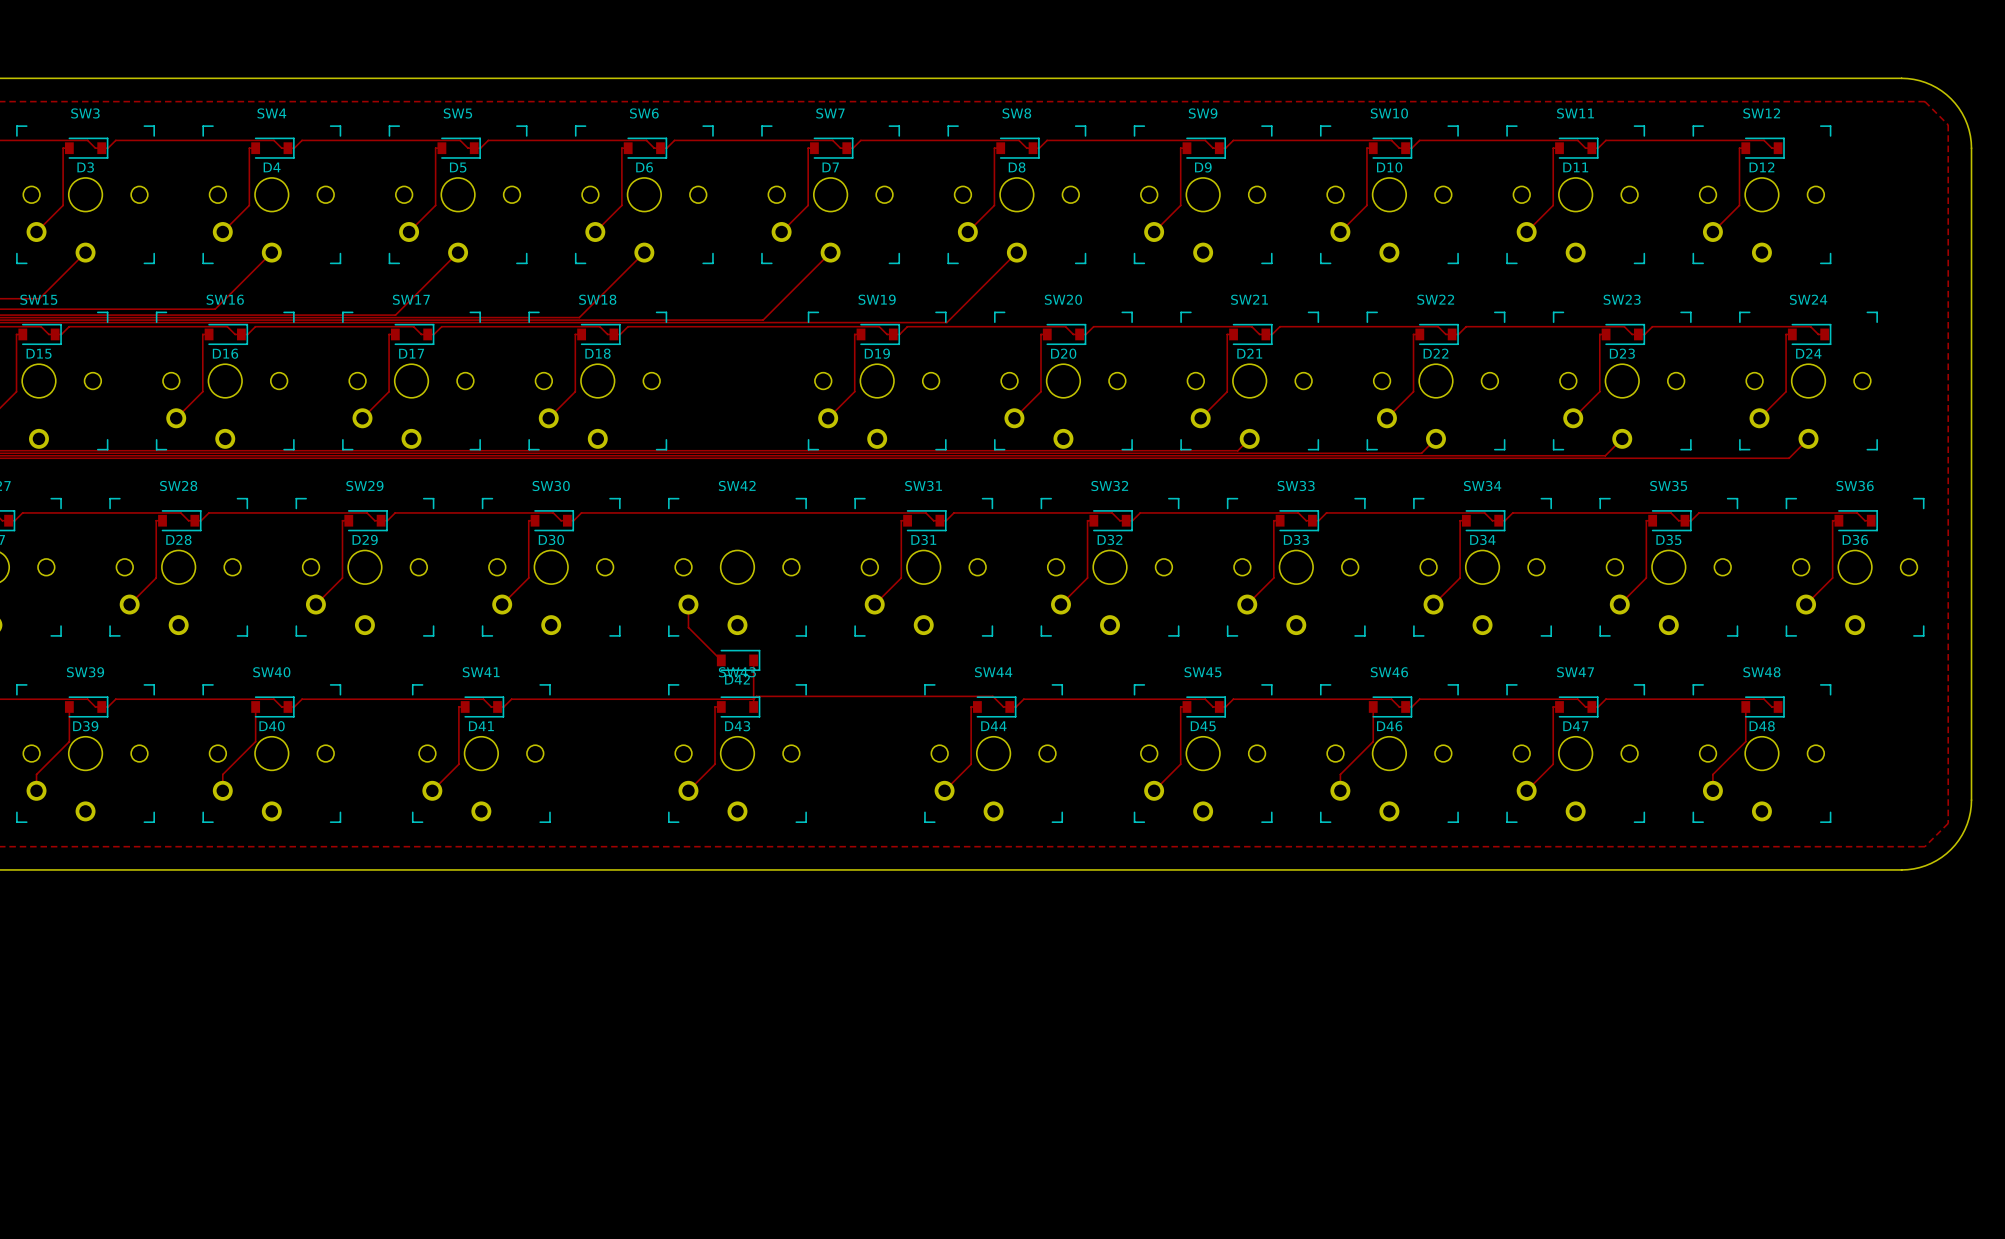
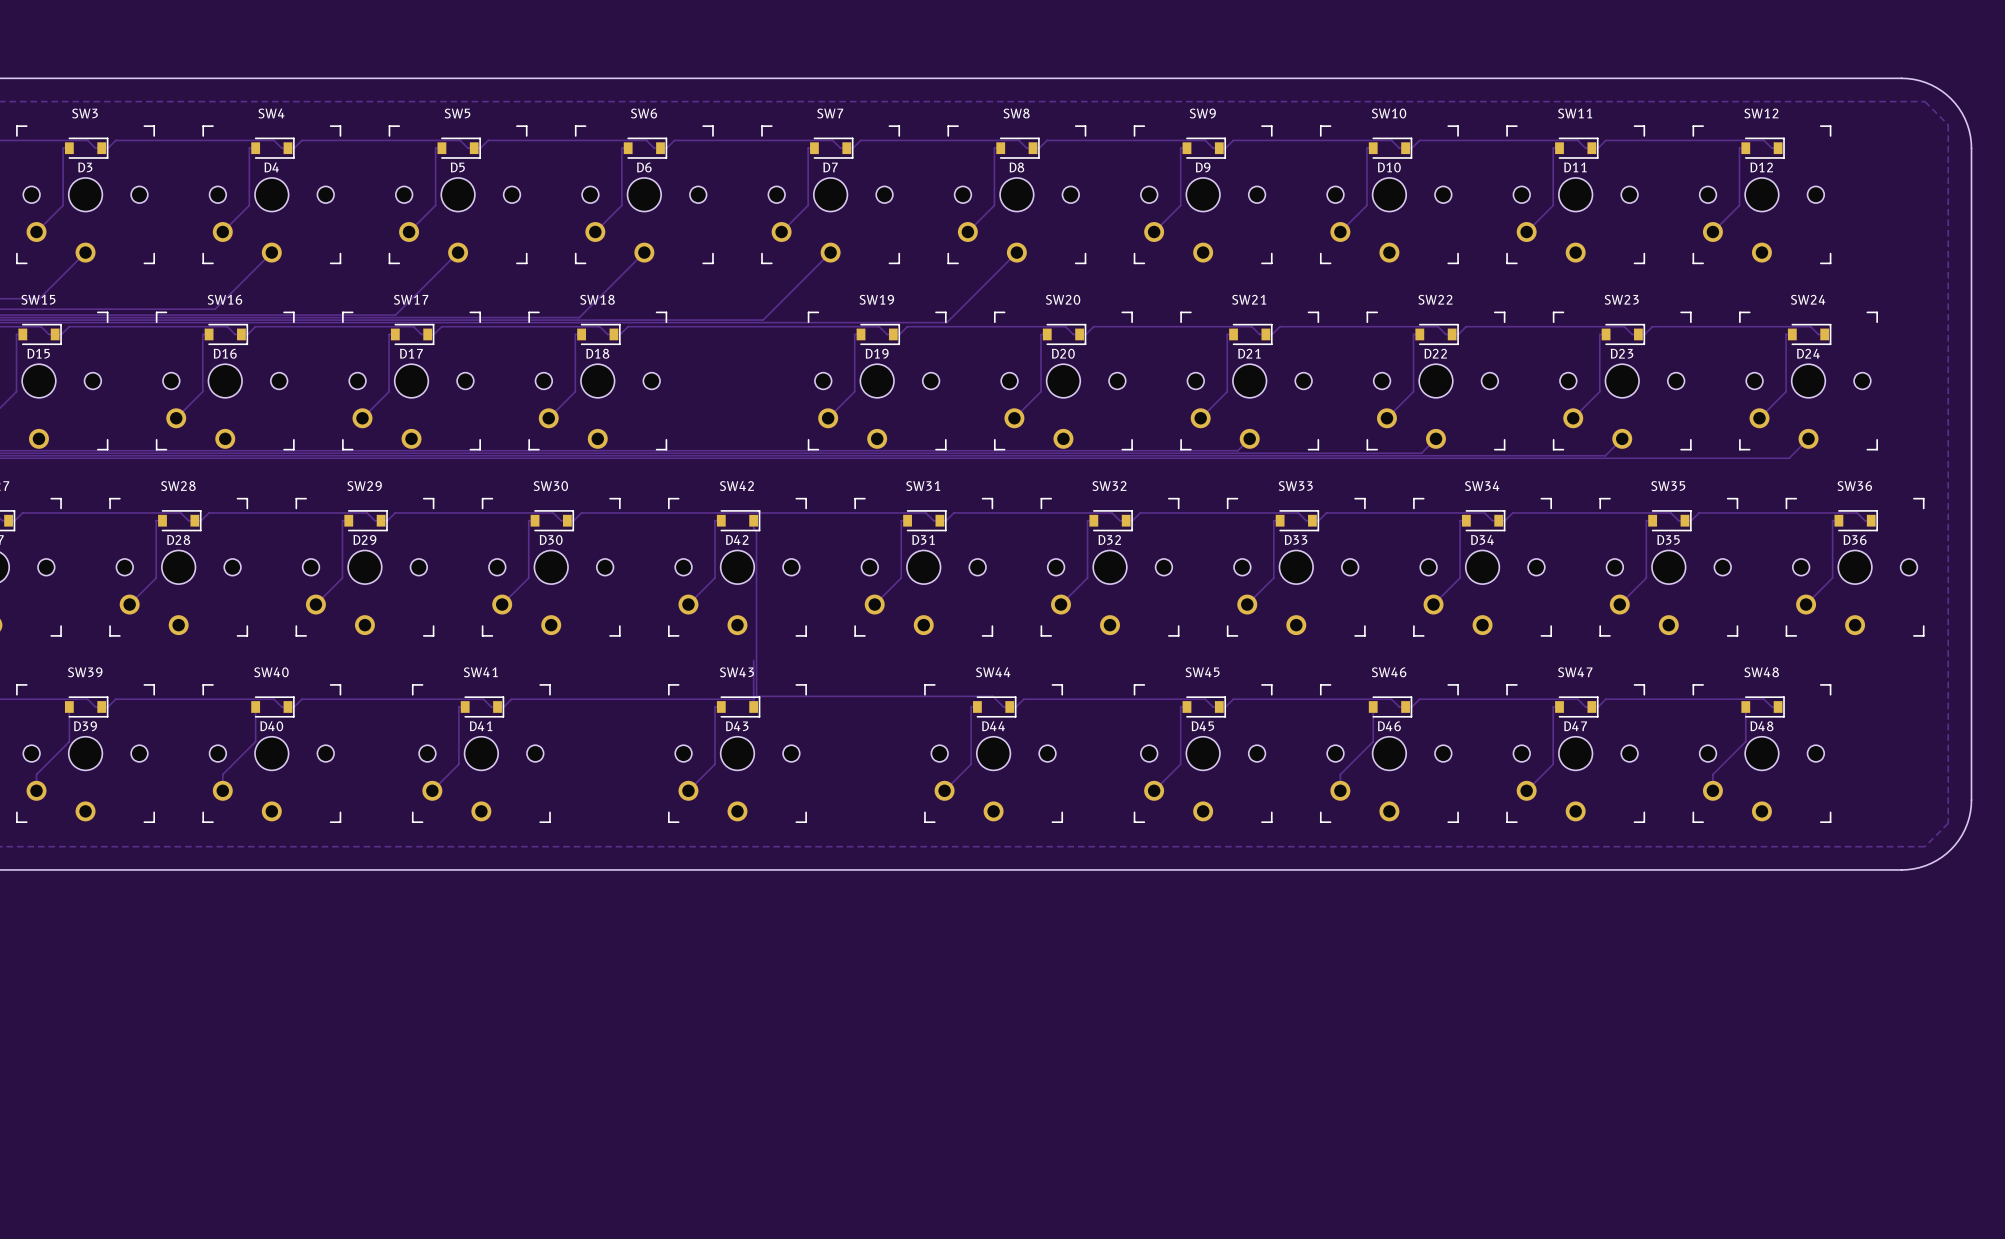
track: none -> (753, 520) (753, 528) (756, 531) (756, 696)
track: (688, 604) (688, 627) (721, 660) -> (688, 604) (715, 577) (715, 520) (721, 520)
D42 position: (738, 660) -> (738, 520)

